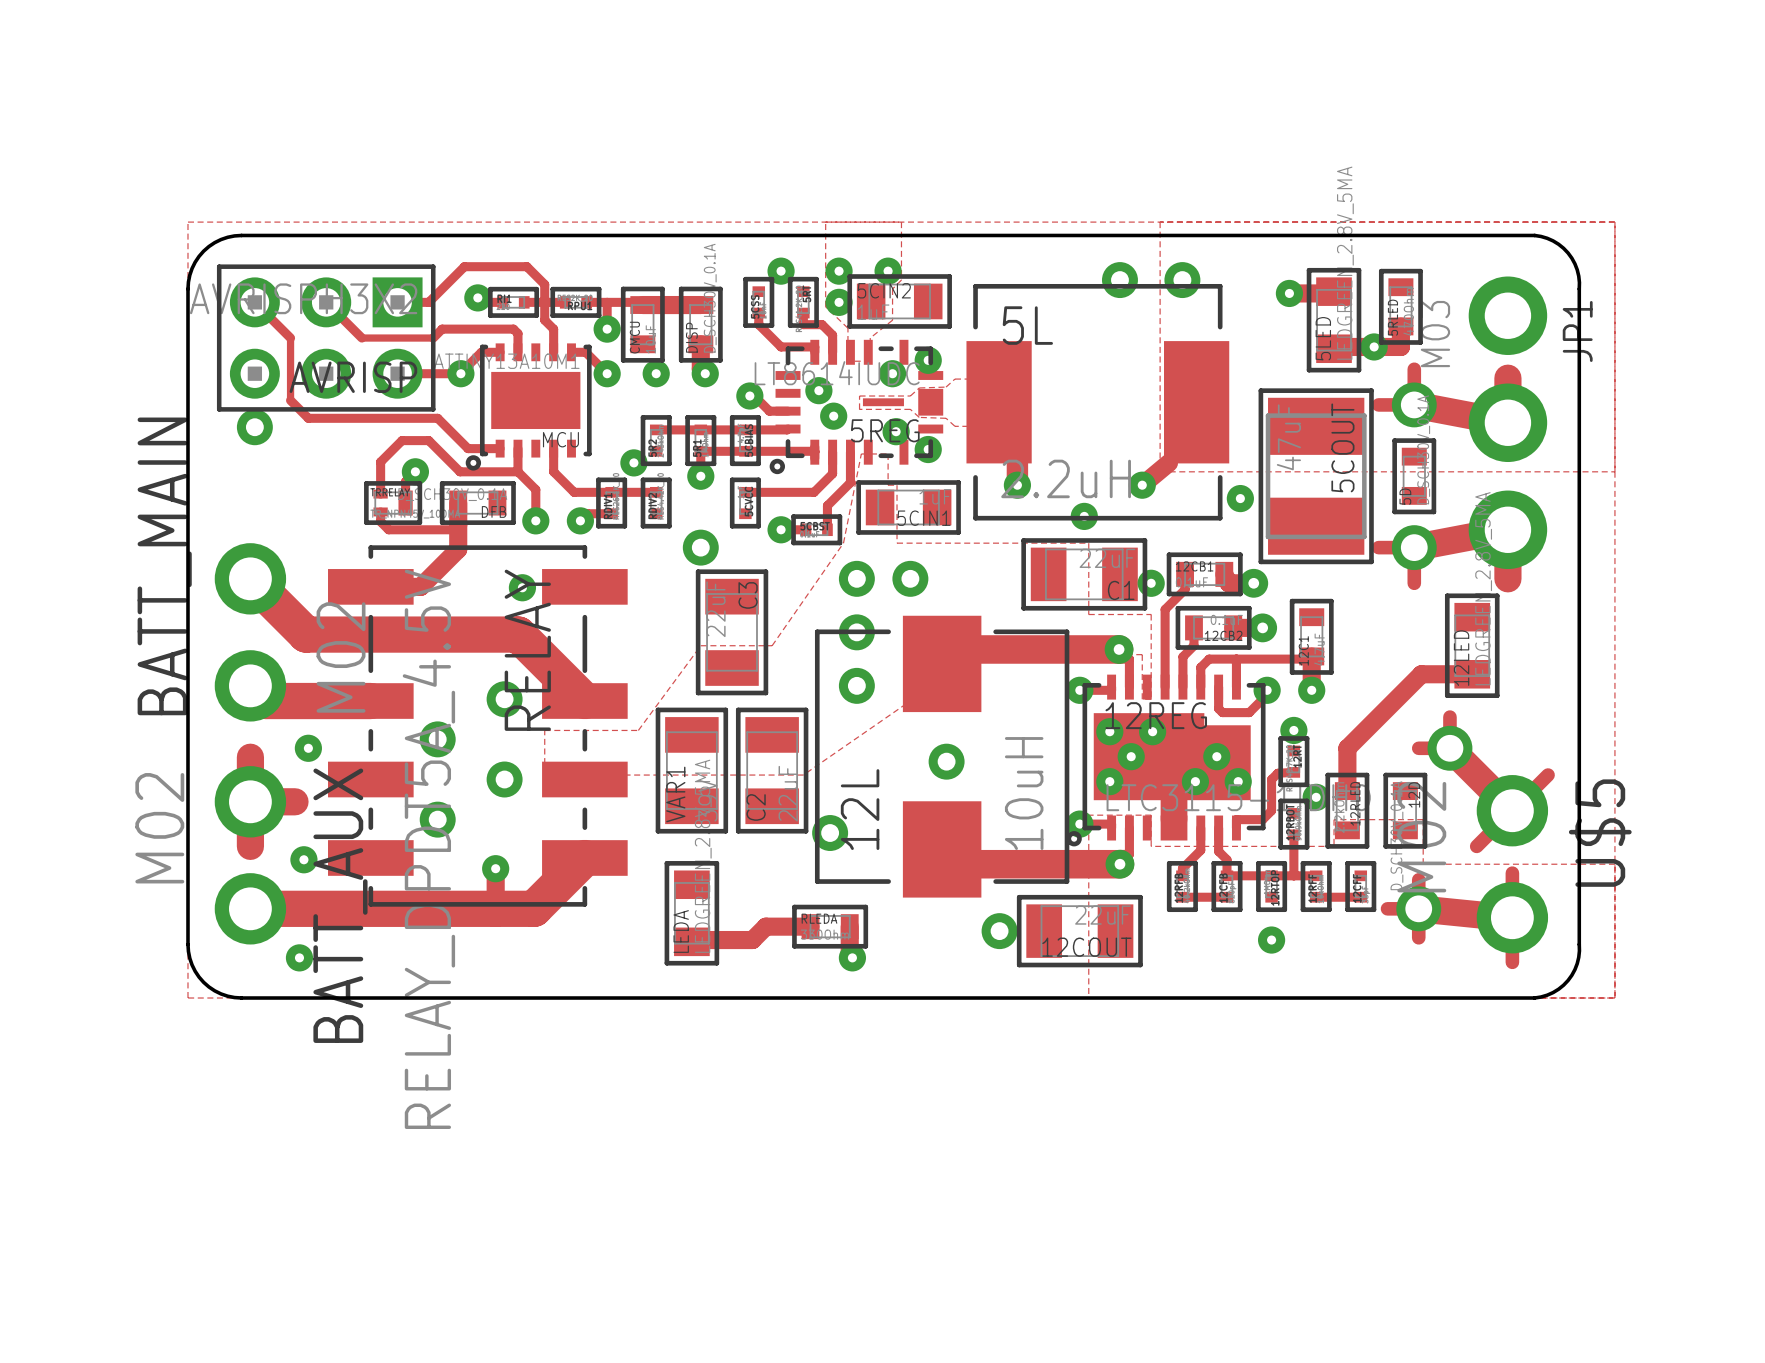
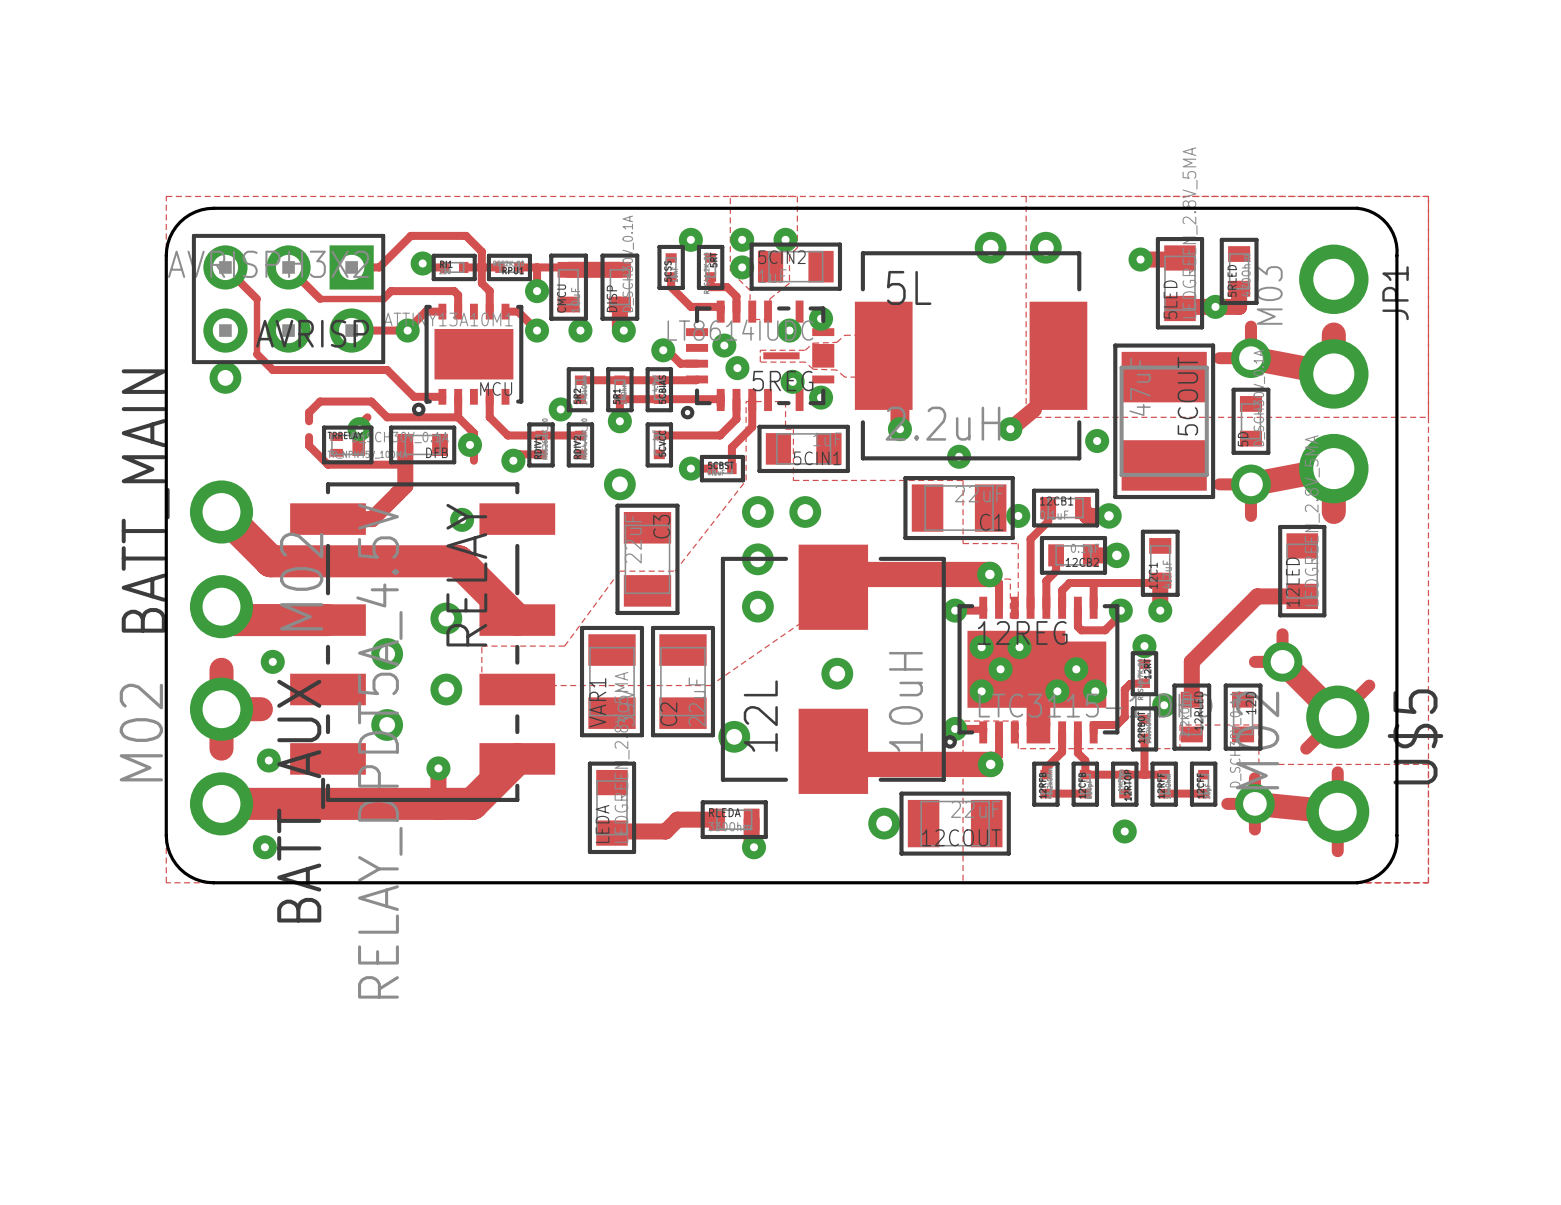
zone outline: (861, 453) (843, 543) (772, 645) (763, 645) -> (761, 401) (746, 401) (746, 480) (675, 571)
via position: (415, 471) -> (359, 429)
track: (460, 471) (428, 440) (402, 440) (380, 462) (380, 494) -> (406, 417) (387, 417) (371, 401) (320, 401) (309, 412) (309, 421)
track: none -> (309, 437) (309, 445) (328, 464) (397, 464)
track: (380, 511) (380, 521) (388, 529) (458, 529) (458, 525) -> none
via position: (535, 520) -> (469, 444)

